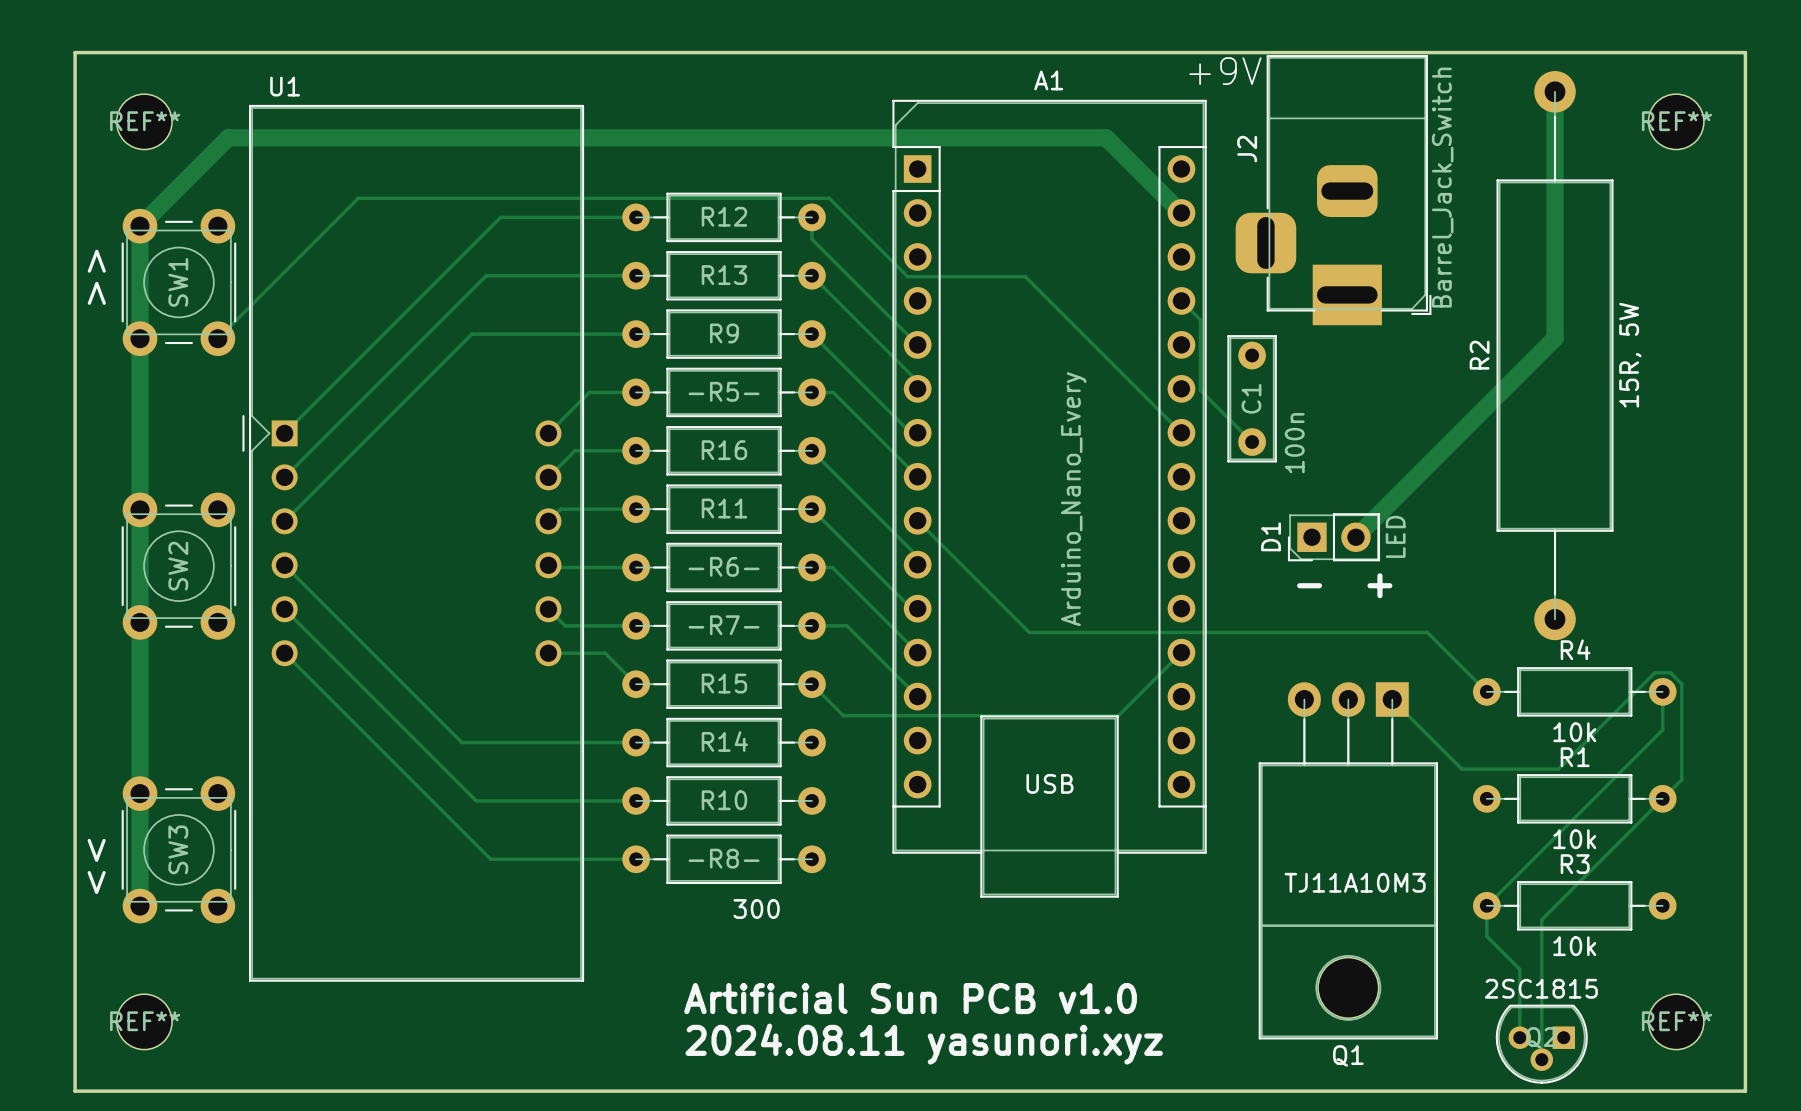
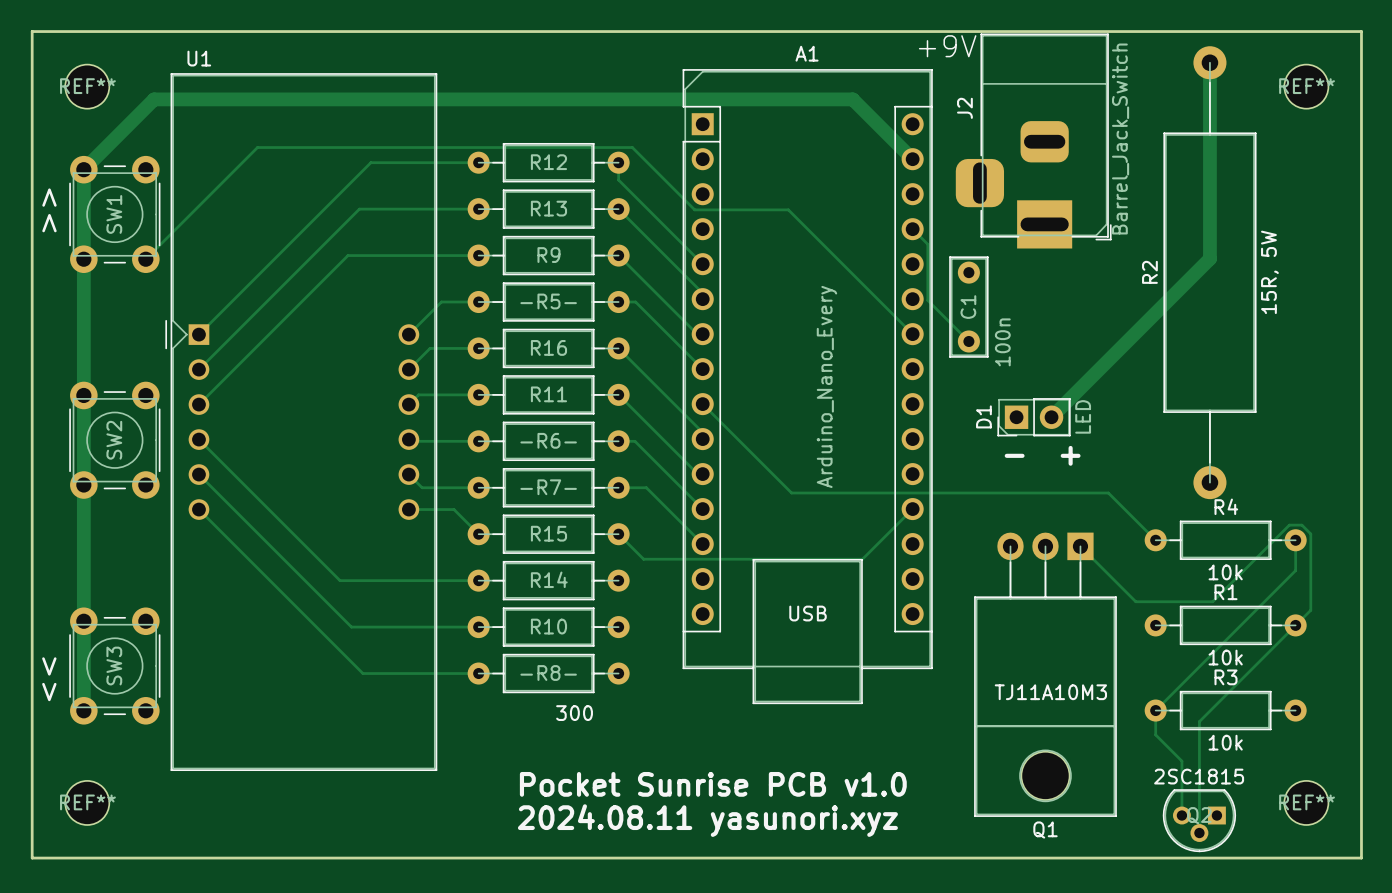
text: Artificial Sun PCB v1.0 (910, 998) -> Pocket Sunrise PCB v1.0 (713, 784)

